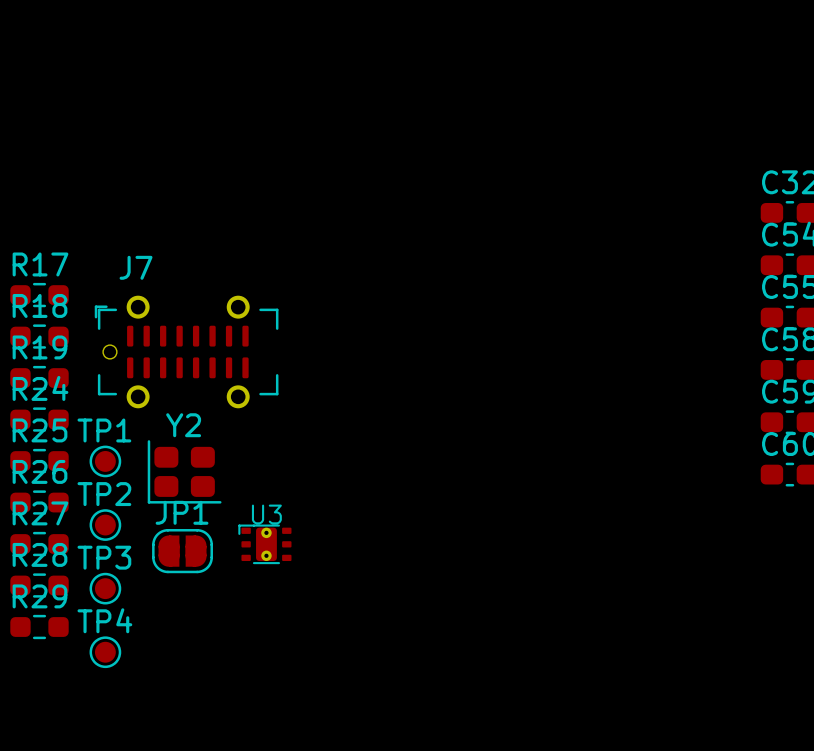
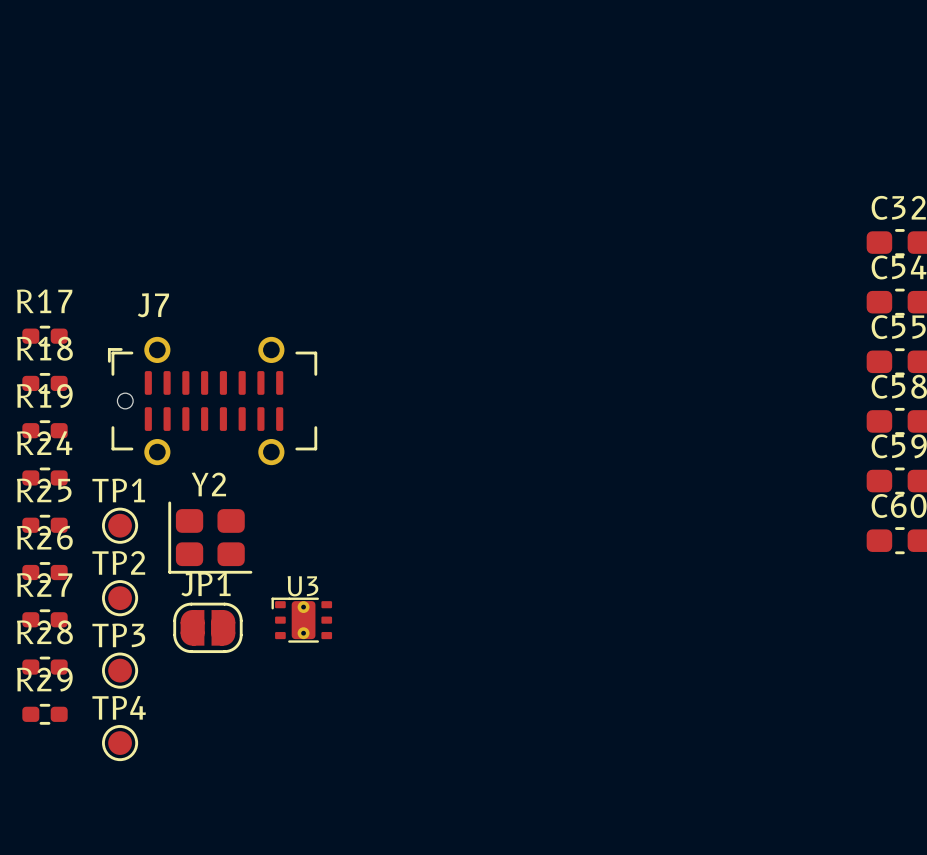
R17 footprint: [10, 282, 69, 308] -> [22, 325, 68, 347]
R18 footprint: [10, 324, 69, 349] -> [22, 372, 68, 394]
R19 footprint: [10, 365, 69, 391] -> [22, 420, 68, 442]
R24 footprint: [10, 407, 69, 432] -> [22, 467, 68, 489]
R25 footprint: [10, 448, 69, 474] -> [22, 514, 68, 536]
R26 footprint: [10, 490, 69, 515] -> [22, 562, 68, 583]
R27 footprint: [10, 531, 69, 557] -> [22, 609, 68, 631]
R28 footprint: [10, 573, 69, 598] -> [22, 656, 68, 678]
R29 footprint: [10, 614, 69, 640] -> [22, 703, 68, 725]

